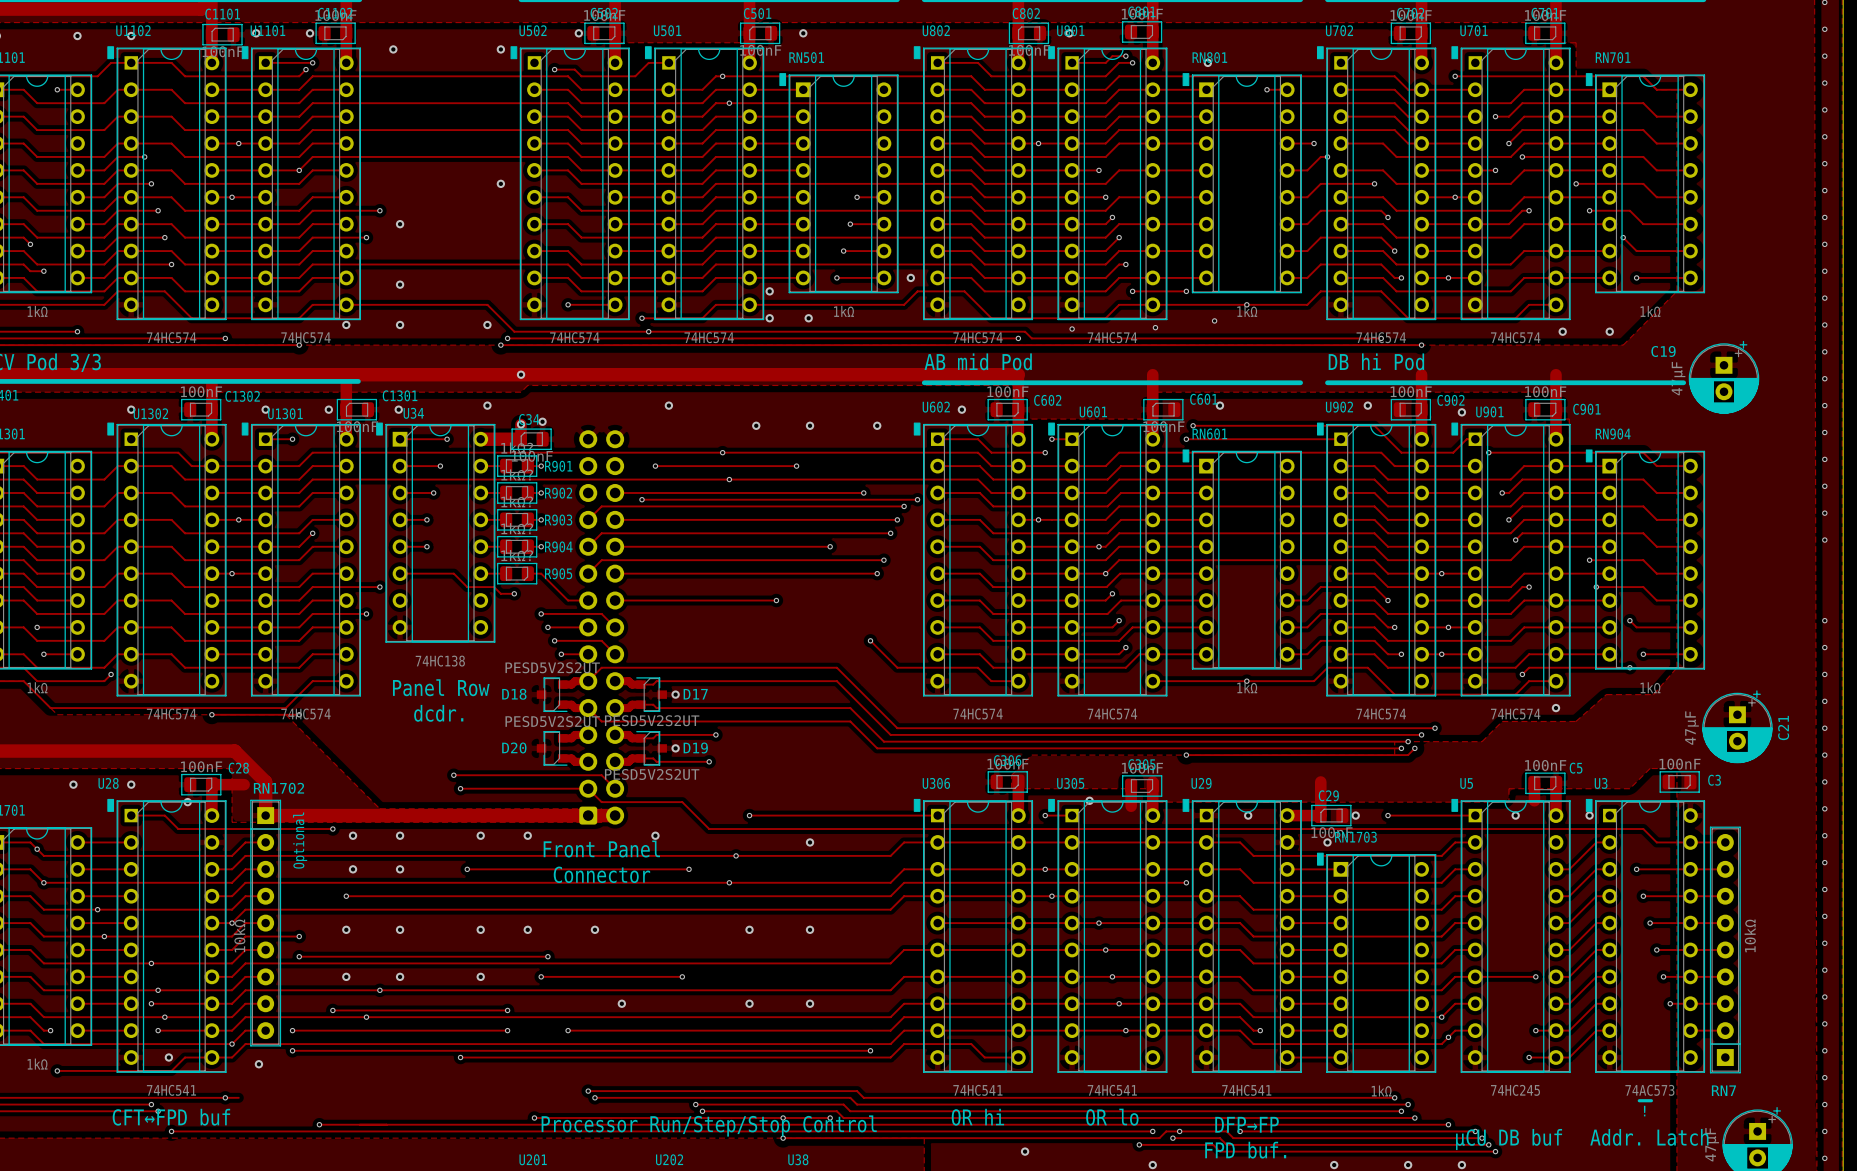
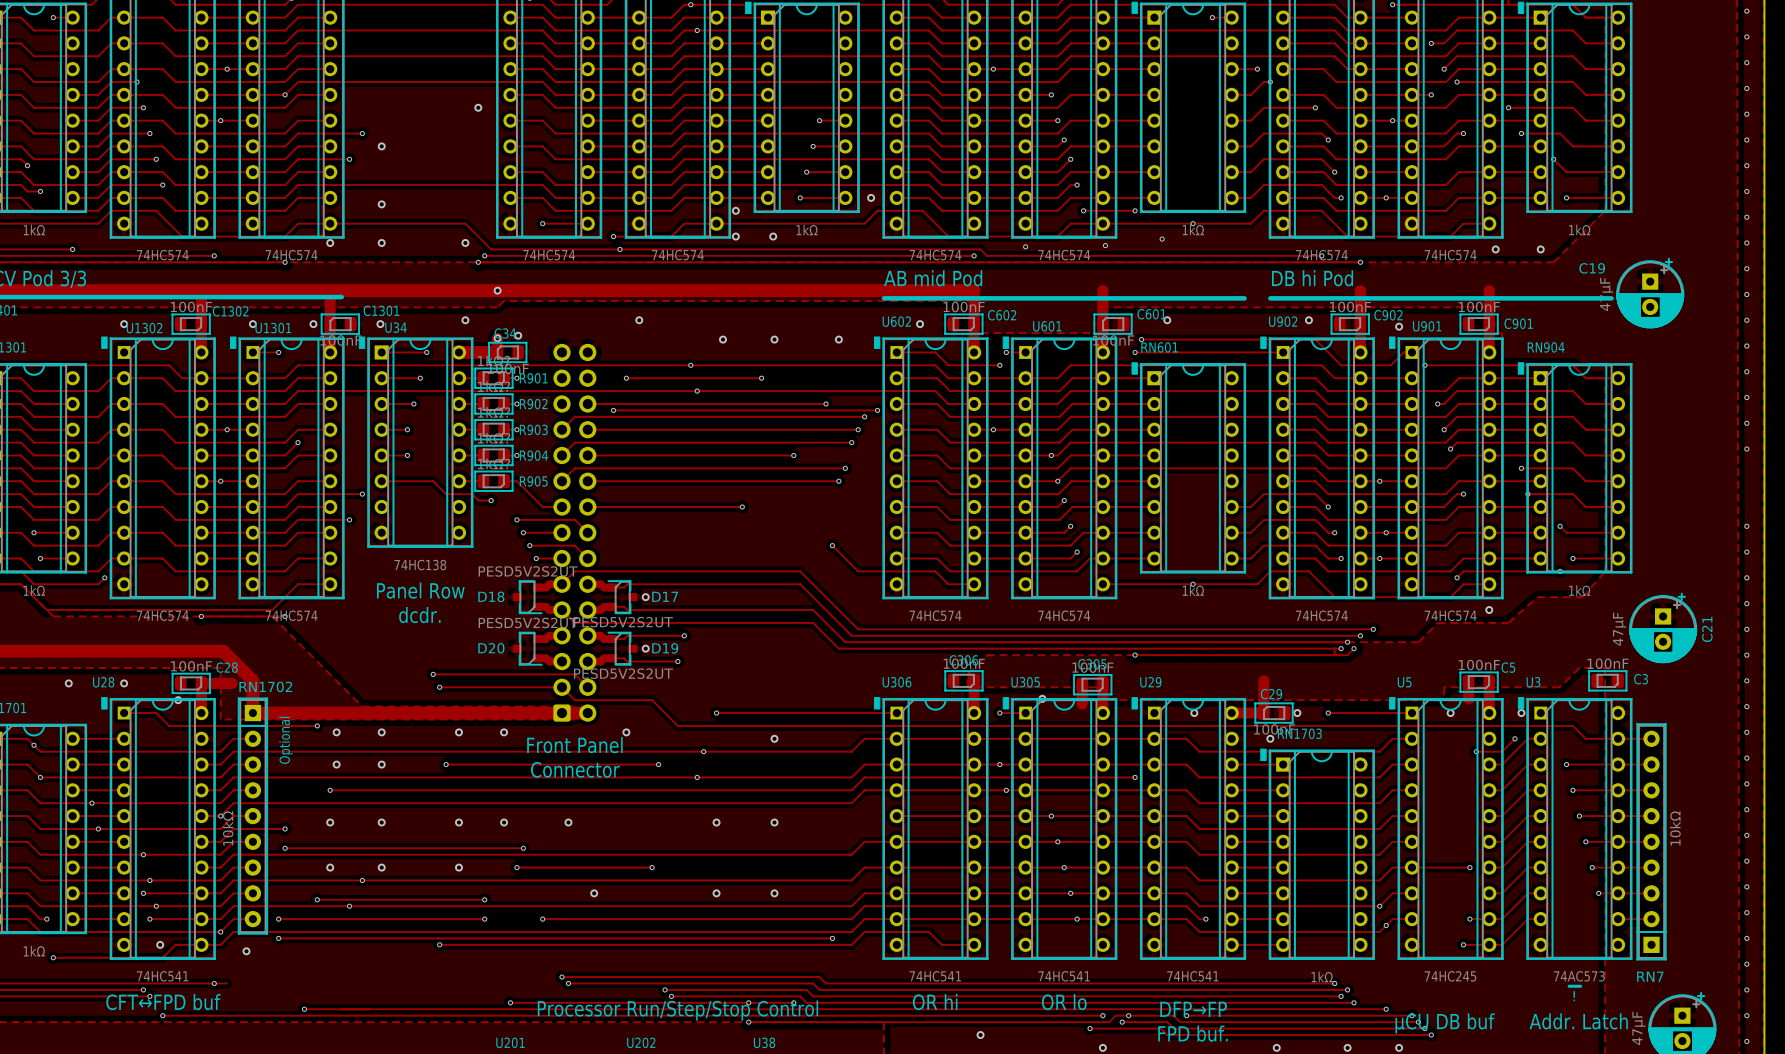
track: none -> (1515, 738) (1502, 751) (1476, 751)
via: none -> (1515, 738)
via: none -> (1476, 751)

